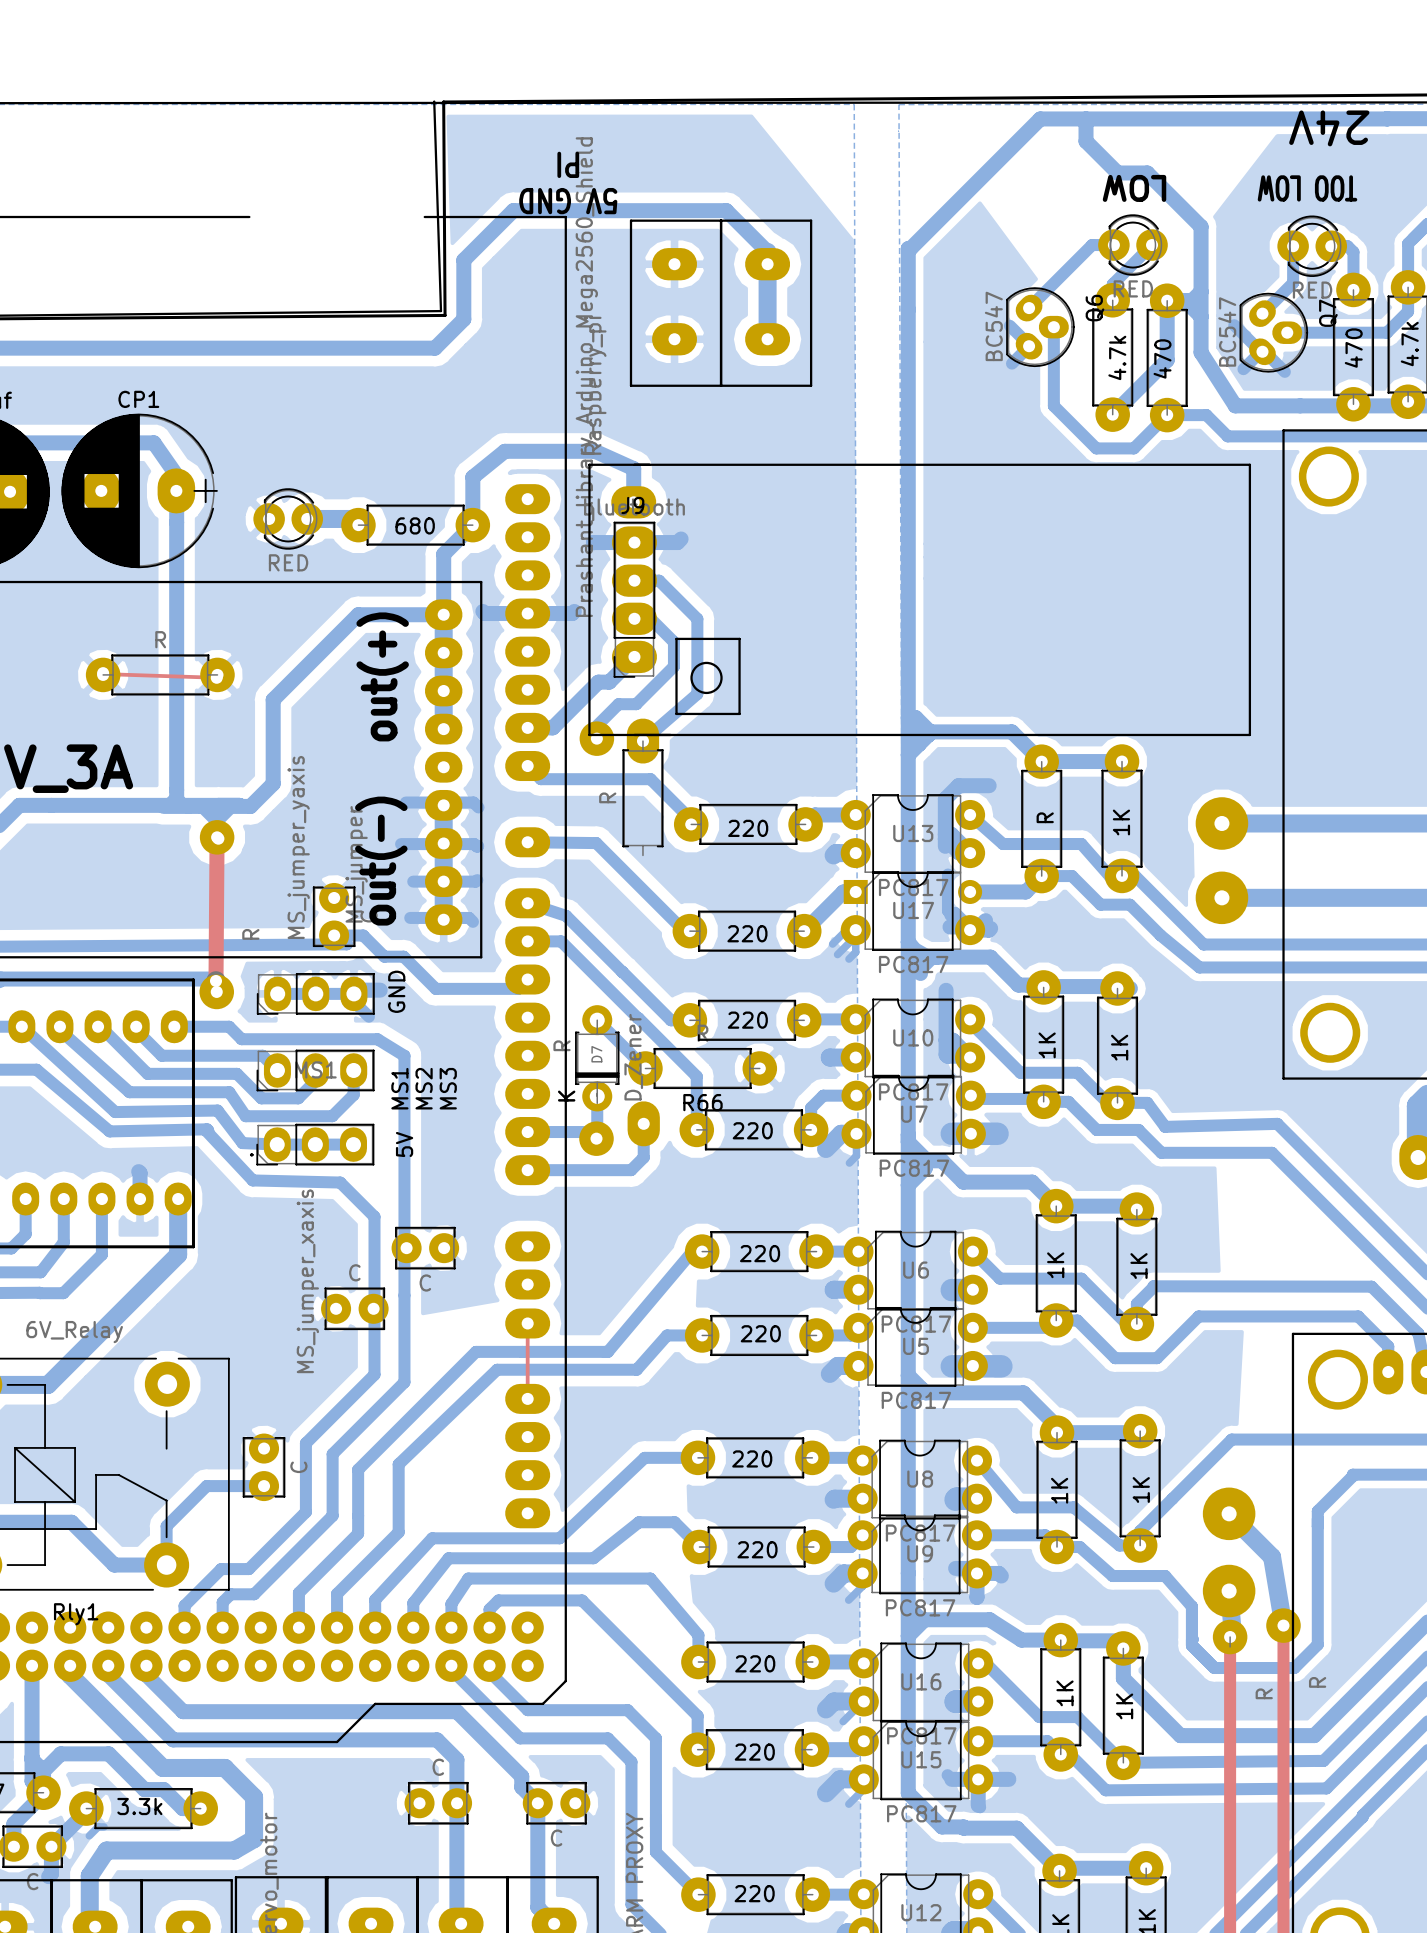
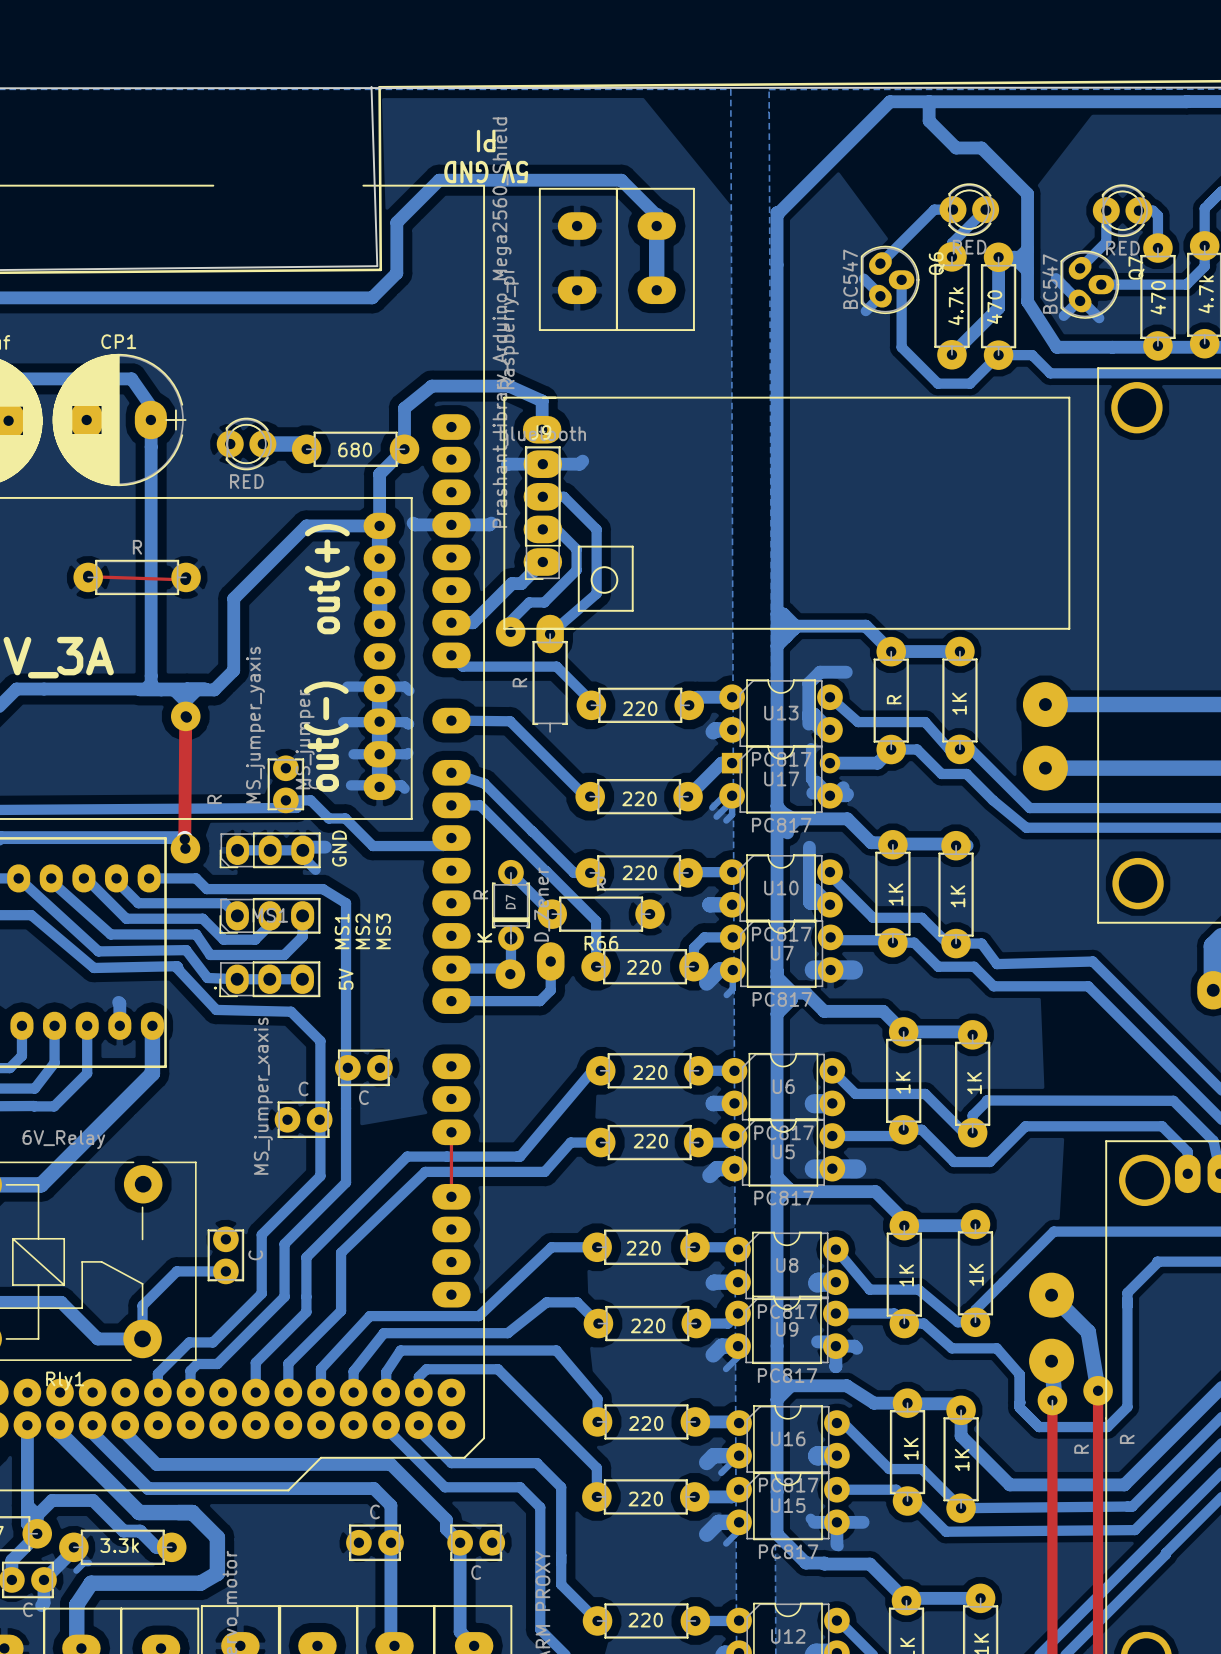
text: 24V (1329, 128) -> none
text: LOW (1134, 188) -> none
text: TOO LOW (1307, 188) -> none

